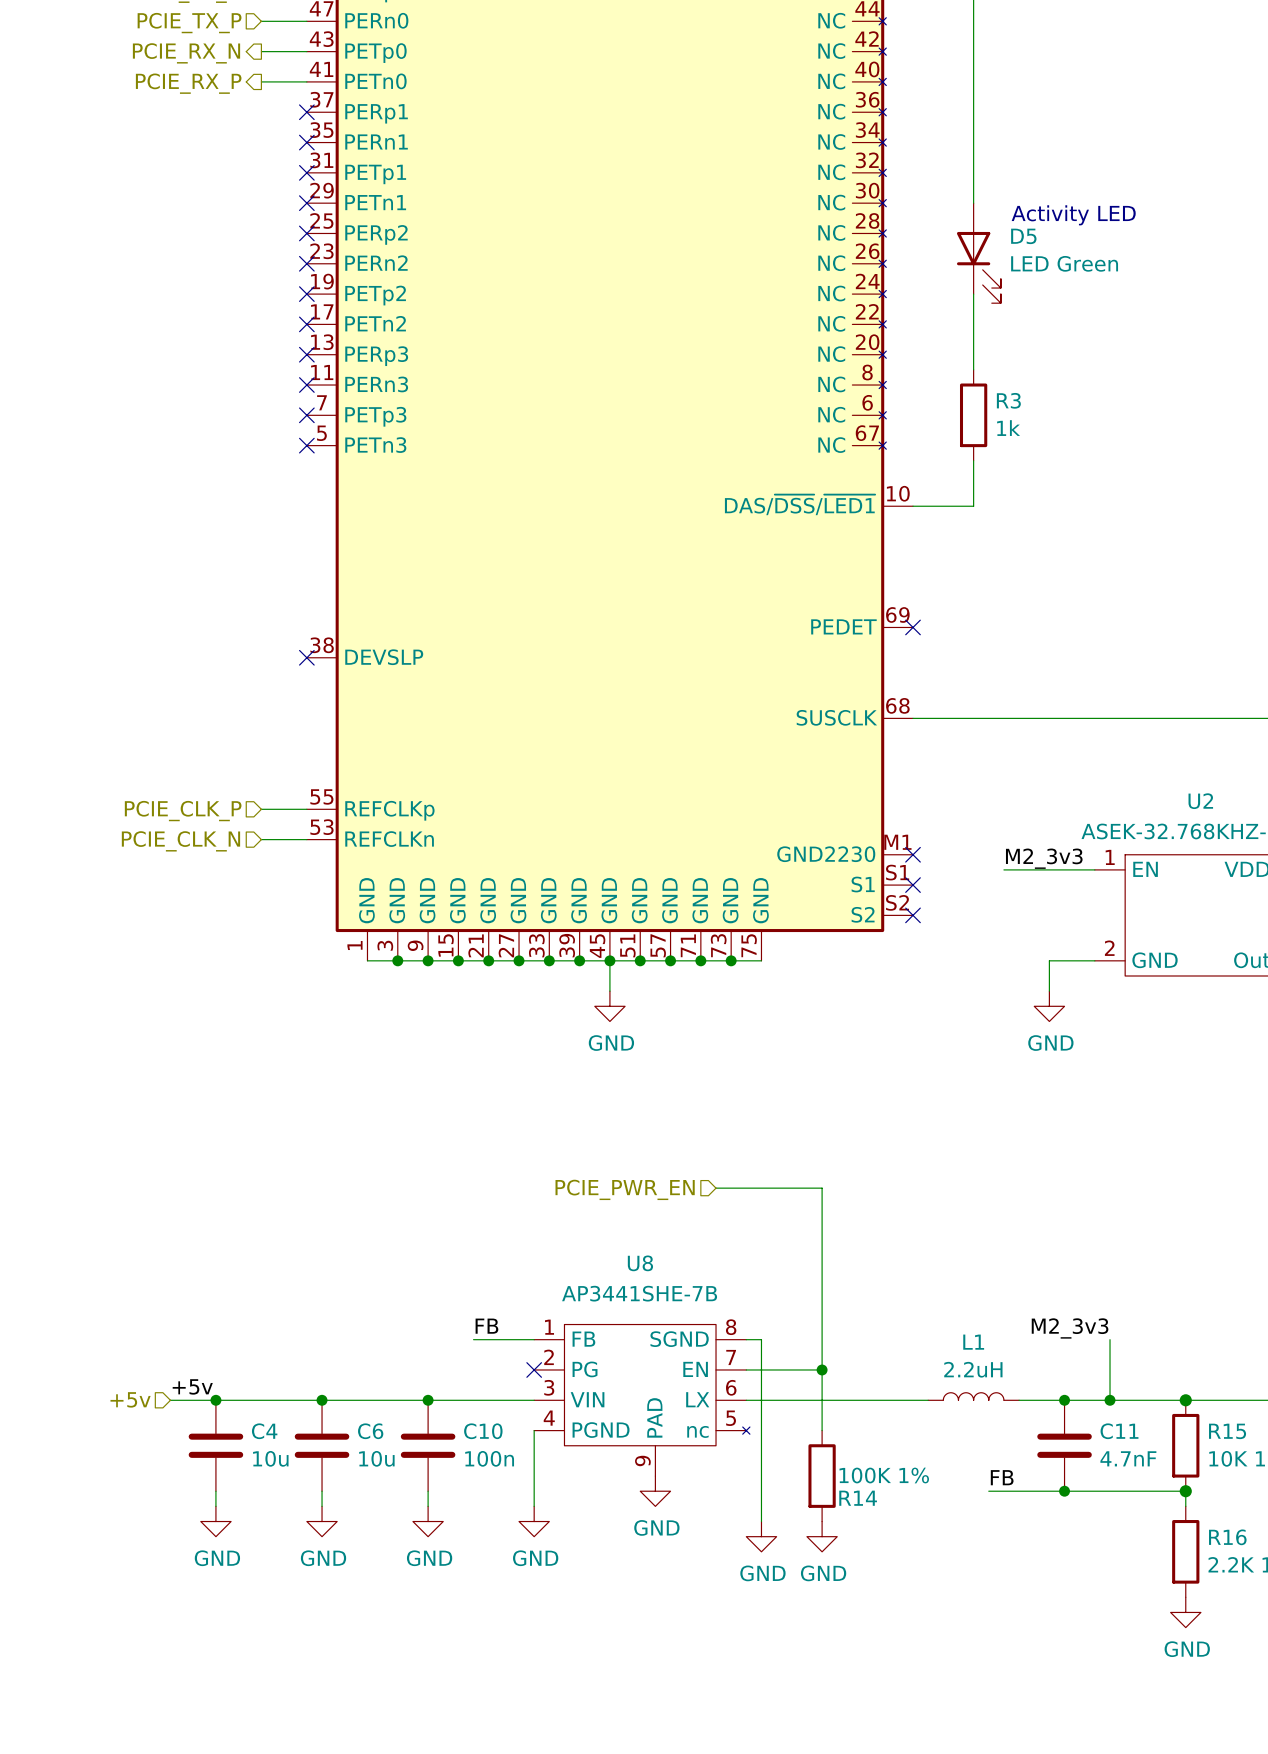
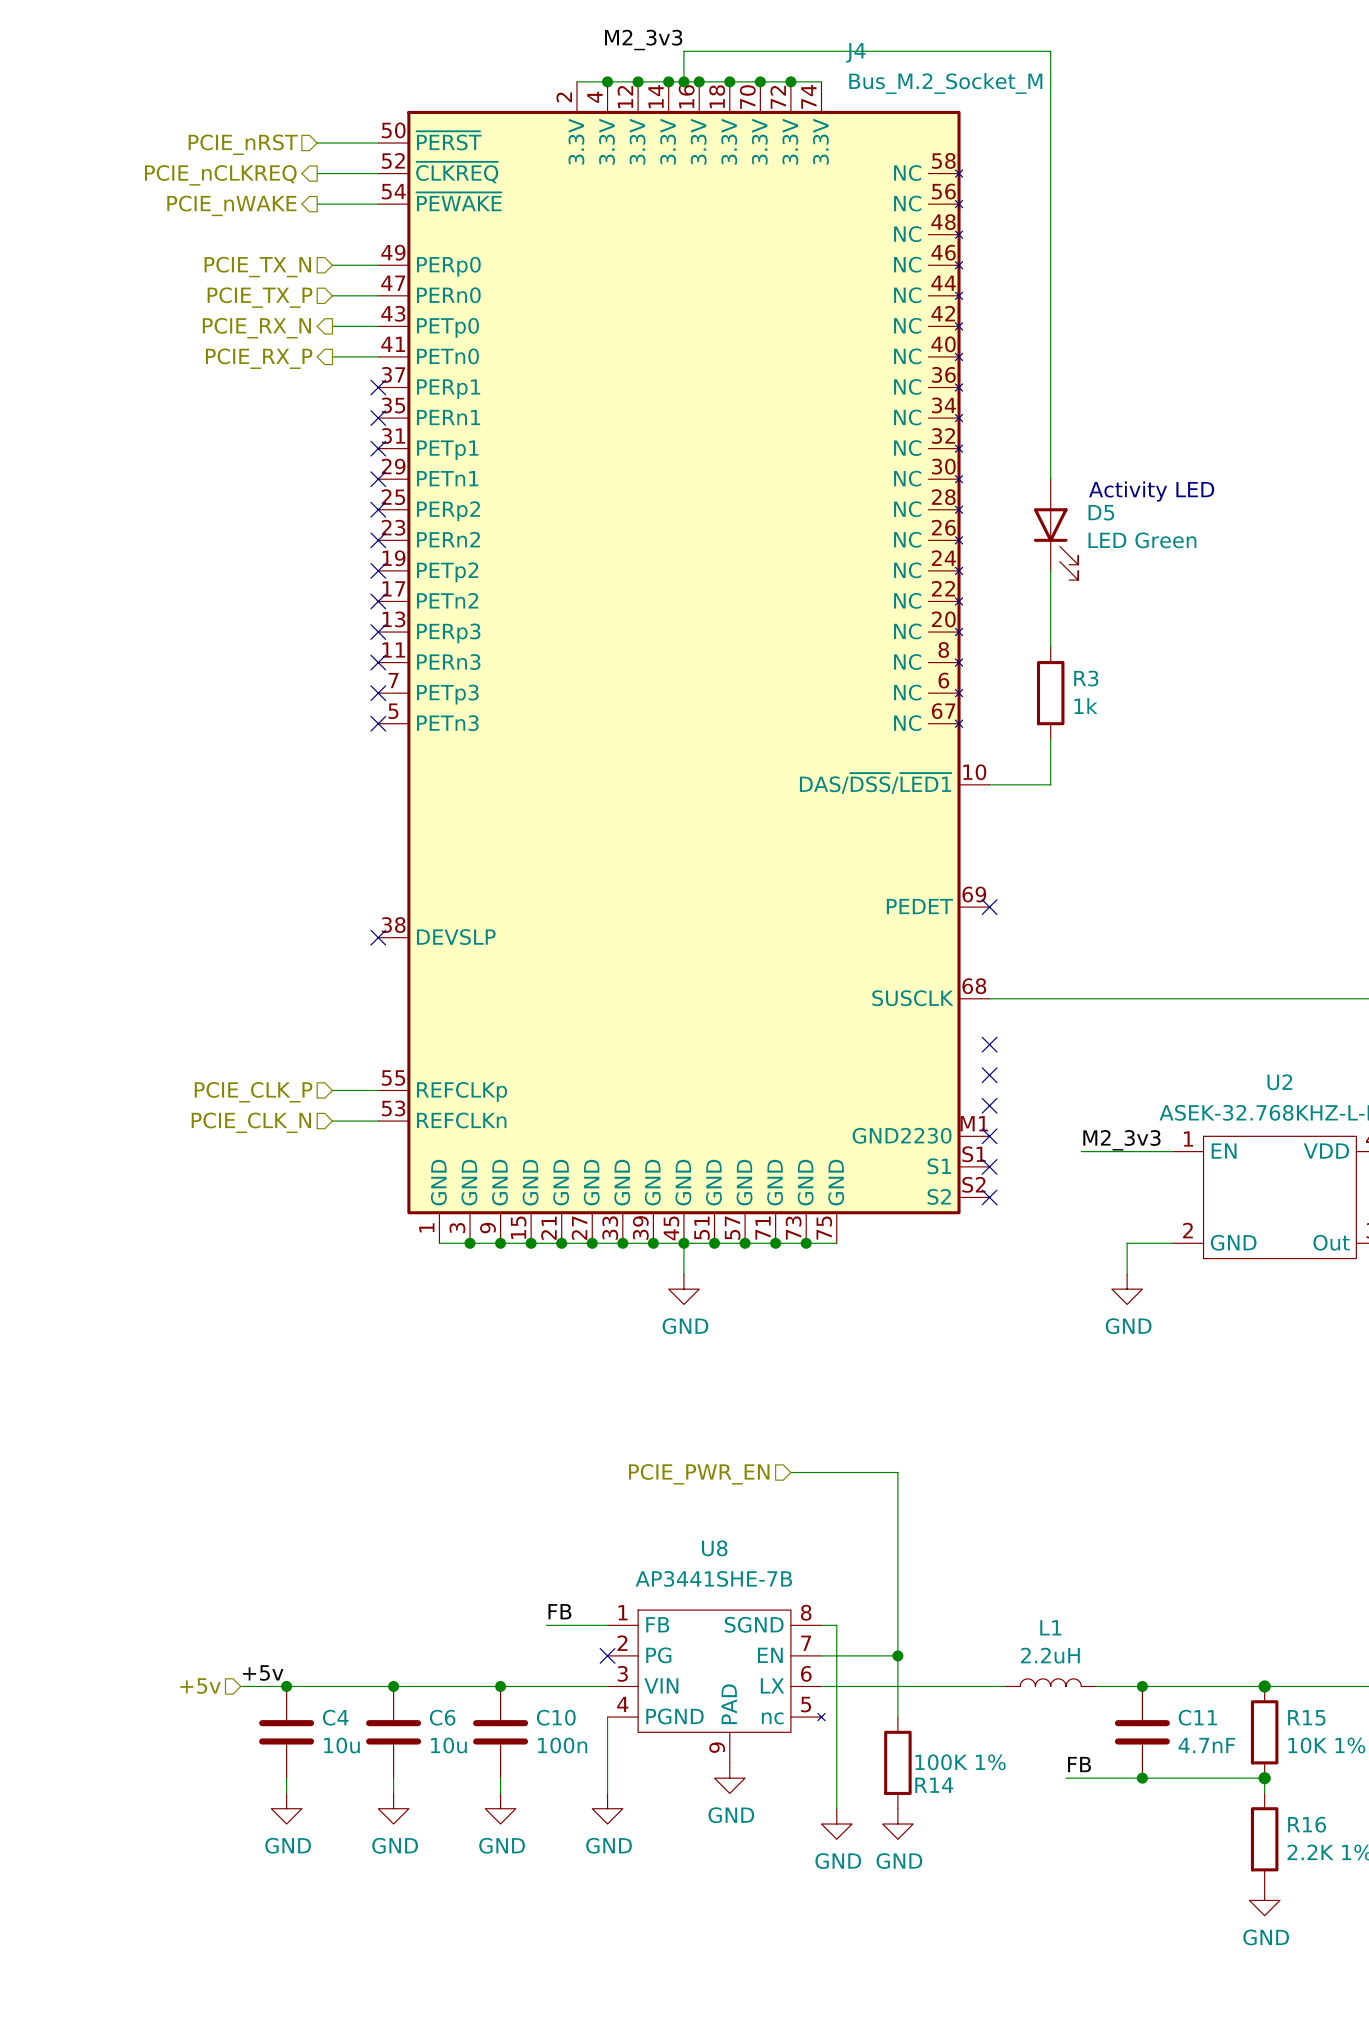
no-connect mark: none -> (989, 1044)
no-connect mark: none -> (989, 1075)
no-connect mark: none -> (989, 1105)
label: M2_3v3 (1070, 1328) -> none
wire: (1110, 1339) (1110, 1400) -> none
junction: (1110, 1400) -> none

